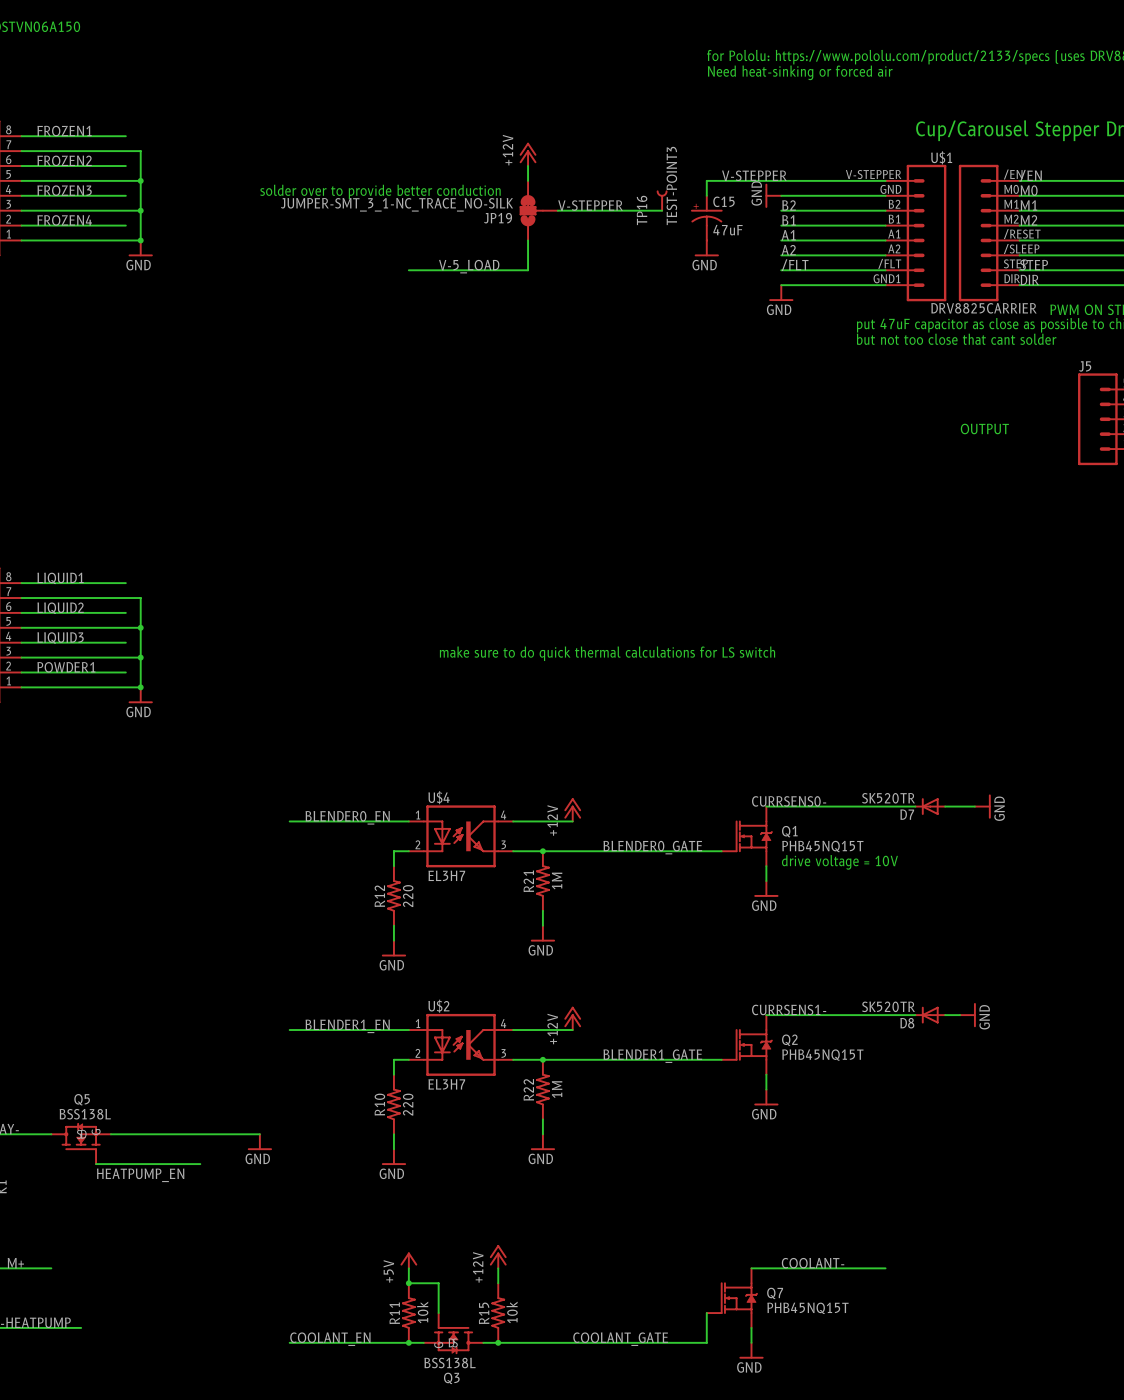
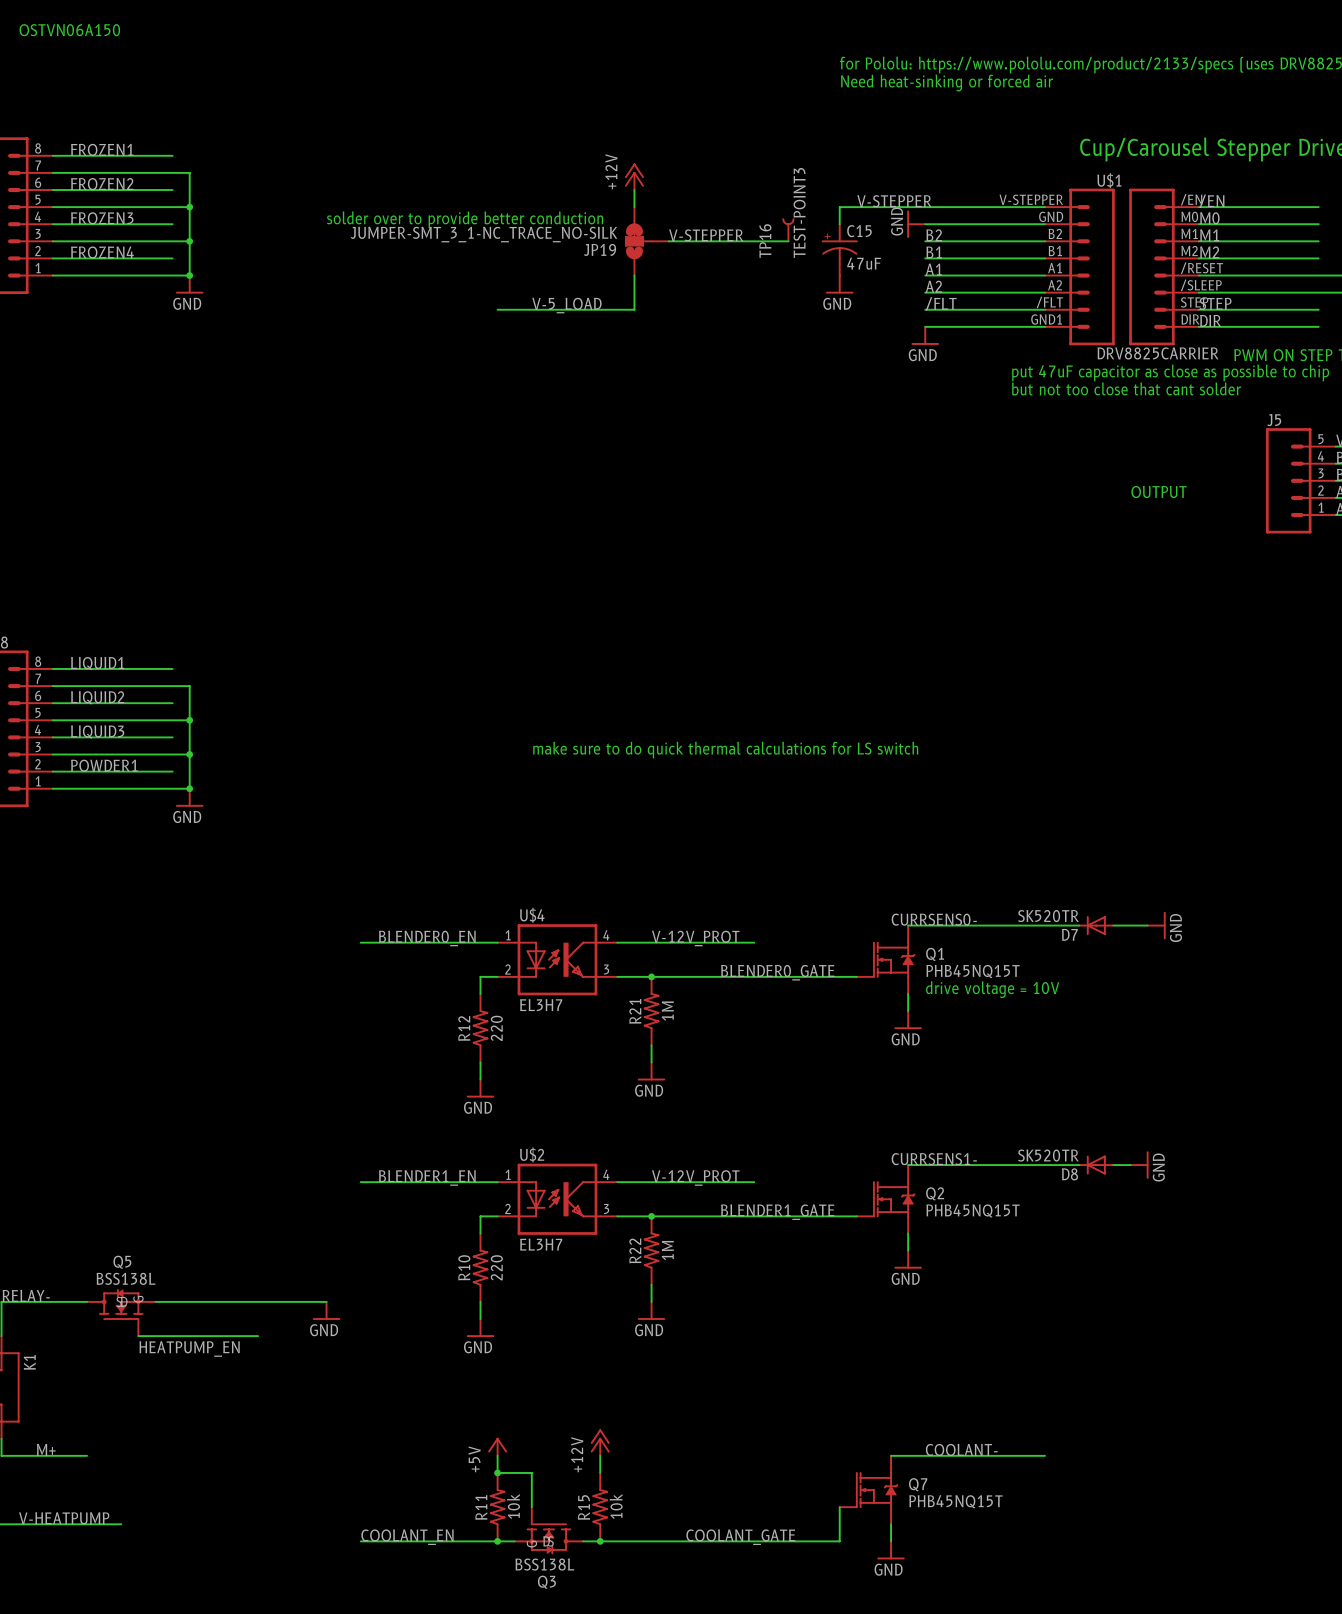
power symbol: +12V (572, 809) -> none
label: none -> V-12V_PROT (695, 938)
wire: none -> (685, 942) (754, 942)
power symbol: +12V (572, 1018) -> none
label: none -> V-12V_PROT (695, 1177)
wire: none -> (685, 1182) (754, 1182)

